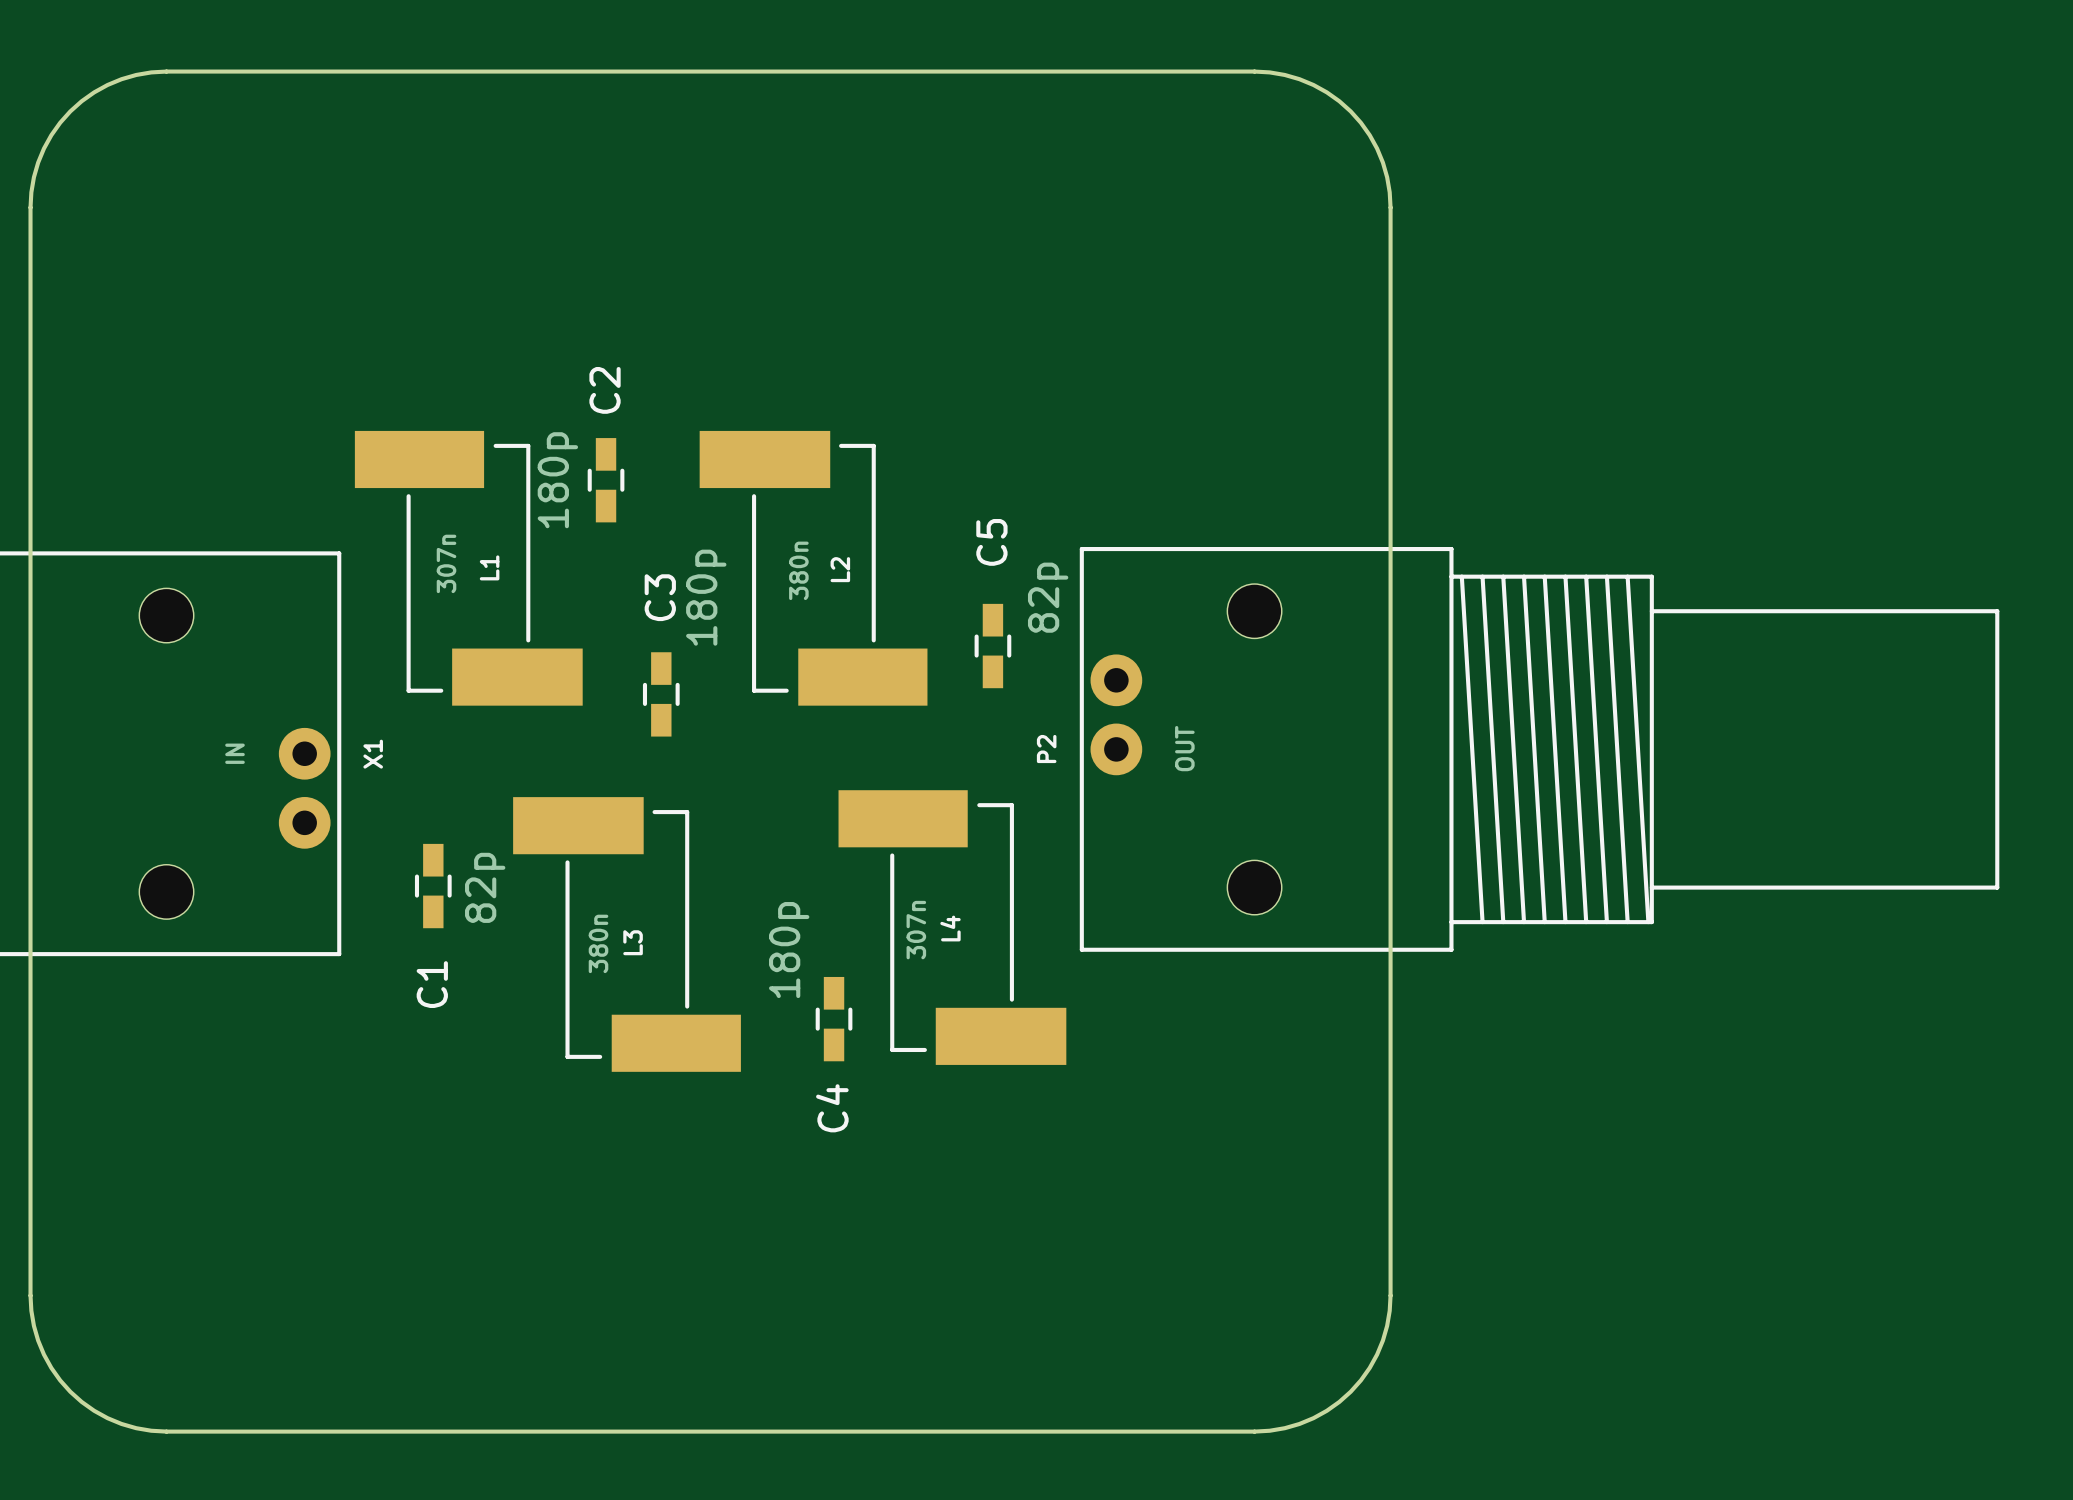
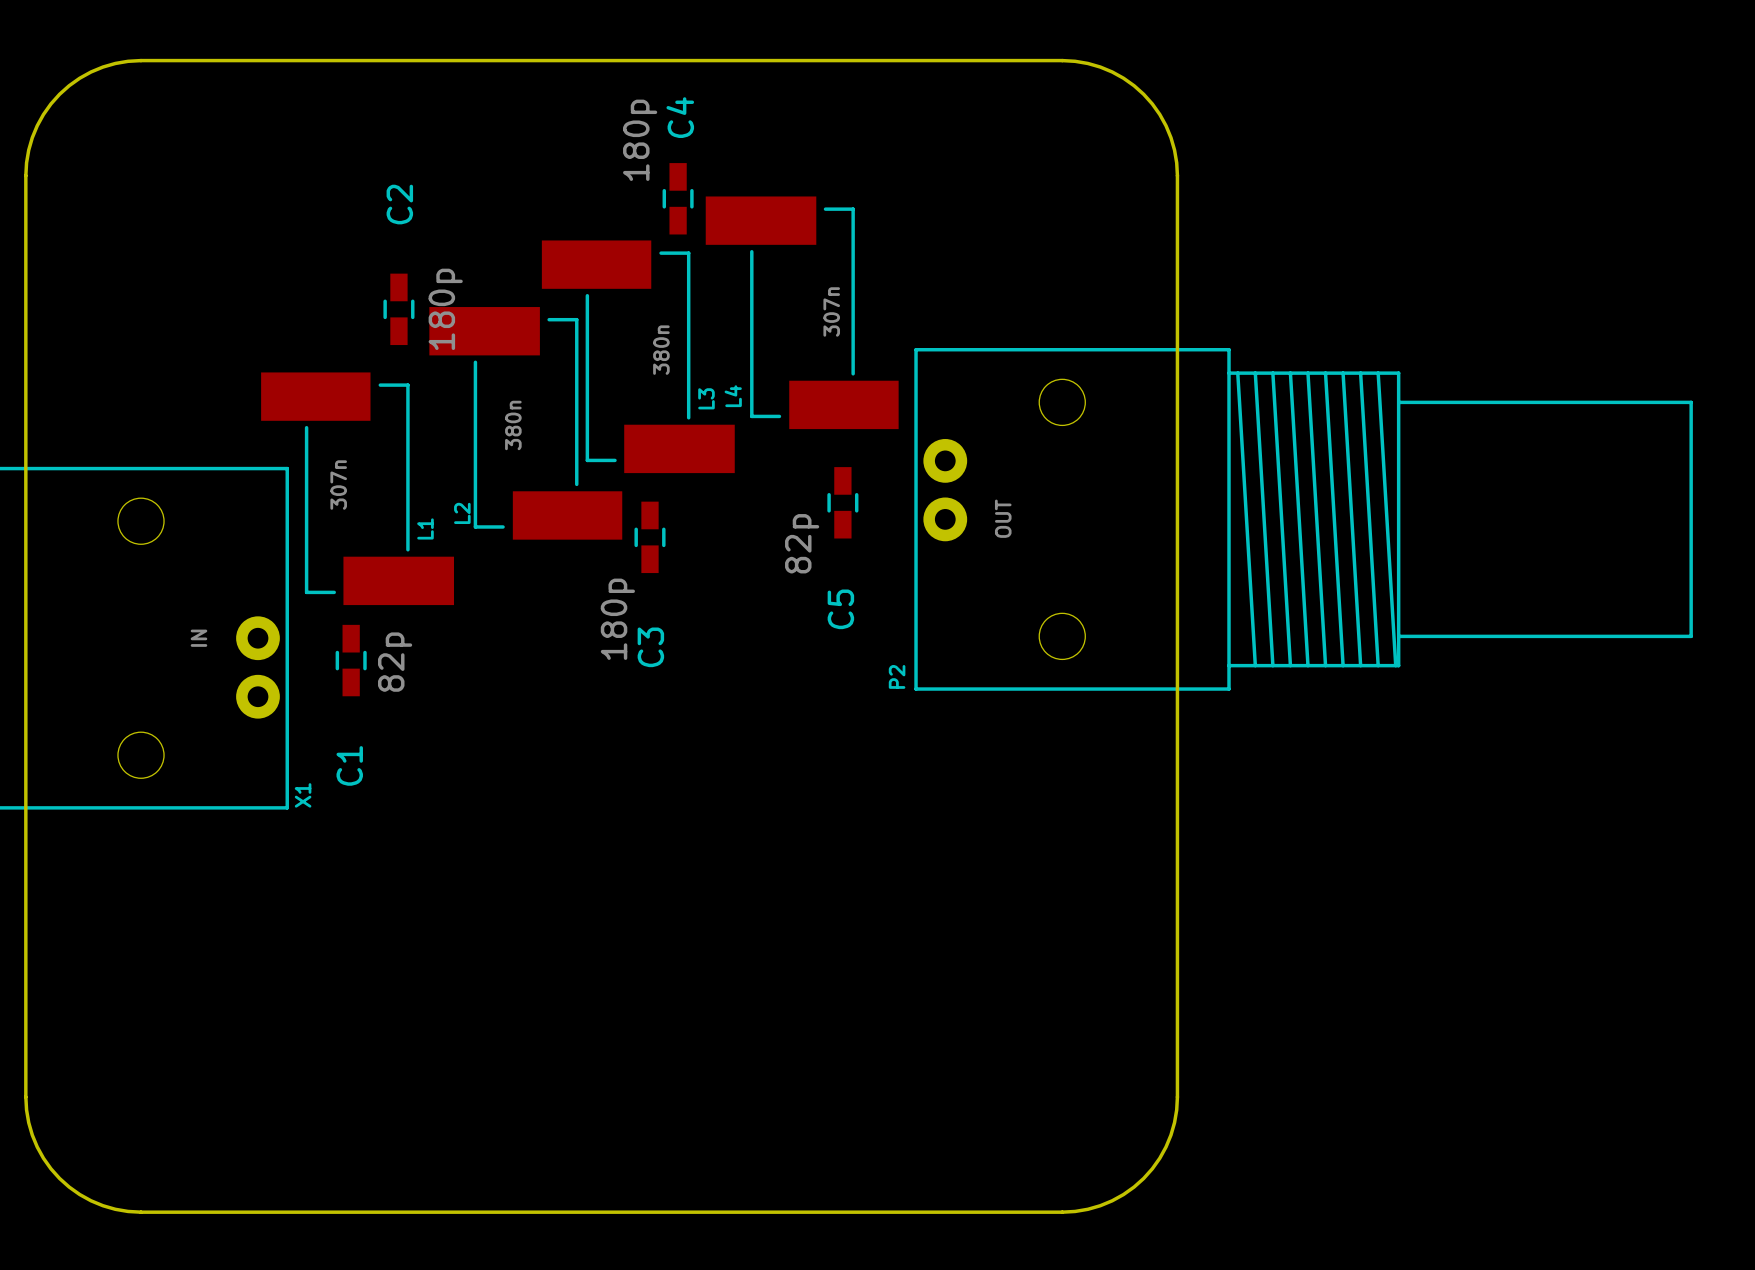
C2 name position: C2 (605, 390) -> C2 (399, 204)
C2 value position: 180p (557, 480) -> 180p (445, 309)
C2 position: (606, 480) -> (398, 309)
C5 name position: C5 (991, 542) -> C5 (840, 609)
L1 name position: L1 (489, 567) -> L1 (425, 528)
L1 position: (468, 568) -> (357, 488)
L2 position: (813, 568) -> (525, 423)
L2 name position: L2 (840, 569) -> L2 (462, 513)
C3 name position: C3 (660, 597) -> C3 (650, 647)
C3 value position: 180p (706, 597) -> 180p (617, 619)
C5 value position: 82p (1048, 597) -> 82p (802, 543)
C5 position: (992, 646) -> (842, 502)
C3 position: (661, 694) -> (650, 537)
P2 name position: P2 (1046, 749) -> P2 (897, 676)
P2 position: (1539, 749) -> (1303, 519)
X1 name position: X1 (373, 754) -> X1 (303, 795)
C1 position: (433, 886) -> (351, 660)
L4 rotation: 0° (952, 927) -> 180° (802, 312)
L4 position: (952, 927) -> (802, 312)
L4 name position: L4 (950, 928) -> L4 (733, 396)
L3 rotation: 0° (627, 934) -> 180° (638, 356)
L3 position: (627, 934) -> (638, 356)
L3 name position: L3 (633, 942) -> L3 (706, 398)
C1 name position: C1 (432, 984) -> C1 (349, 765)
C4 position: (834, 1019) -> (678, 198)
C4 name position: C4 (832, 1108) -> C4 (680, 117)

